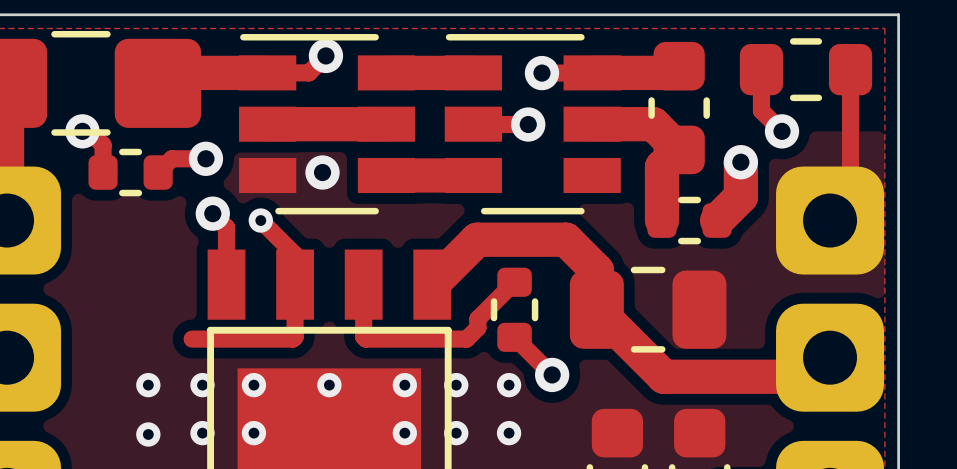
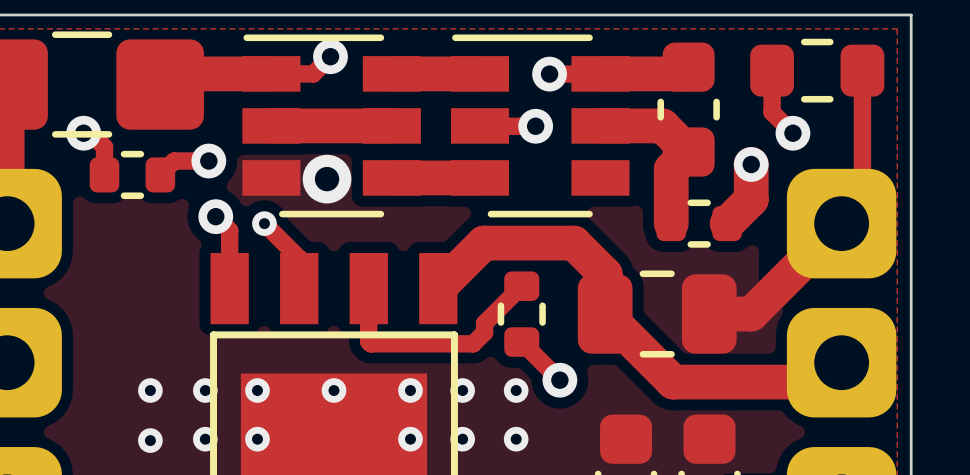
via size: [305, 155, 340, 190] -> [302, 154, 352, 204]
track: none -> (841, 223) (751, 314) (709, 314)
track: (295, 284) (295, 336) (292, 339) (192, 339) -> none

